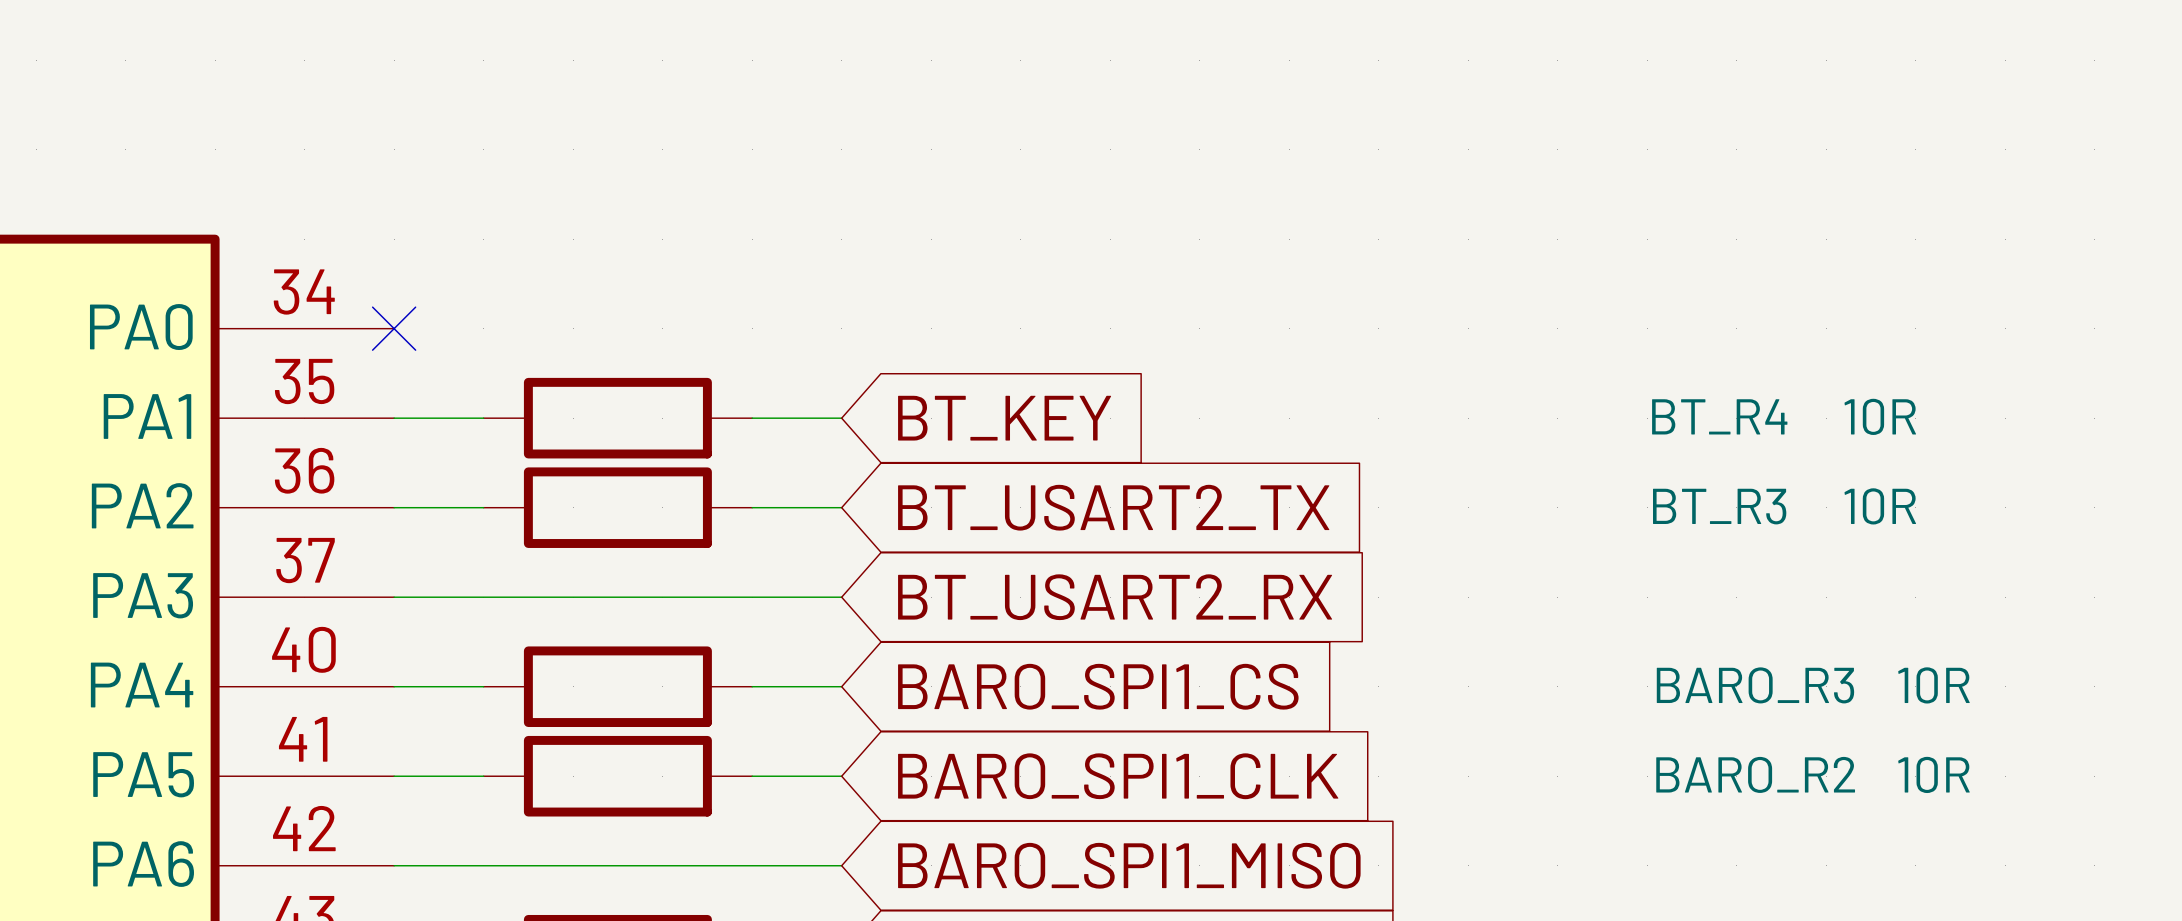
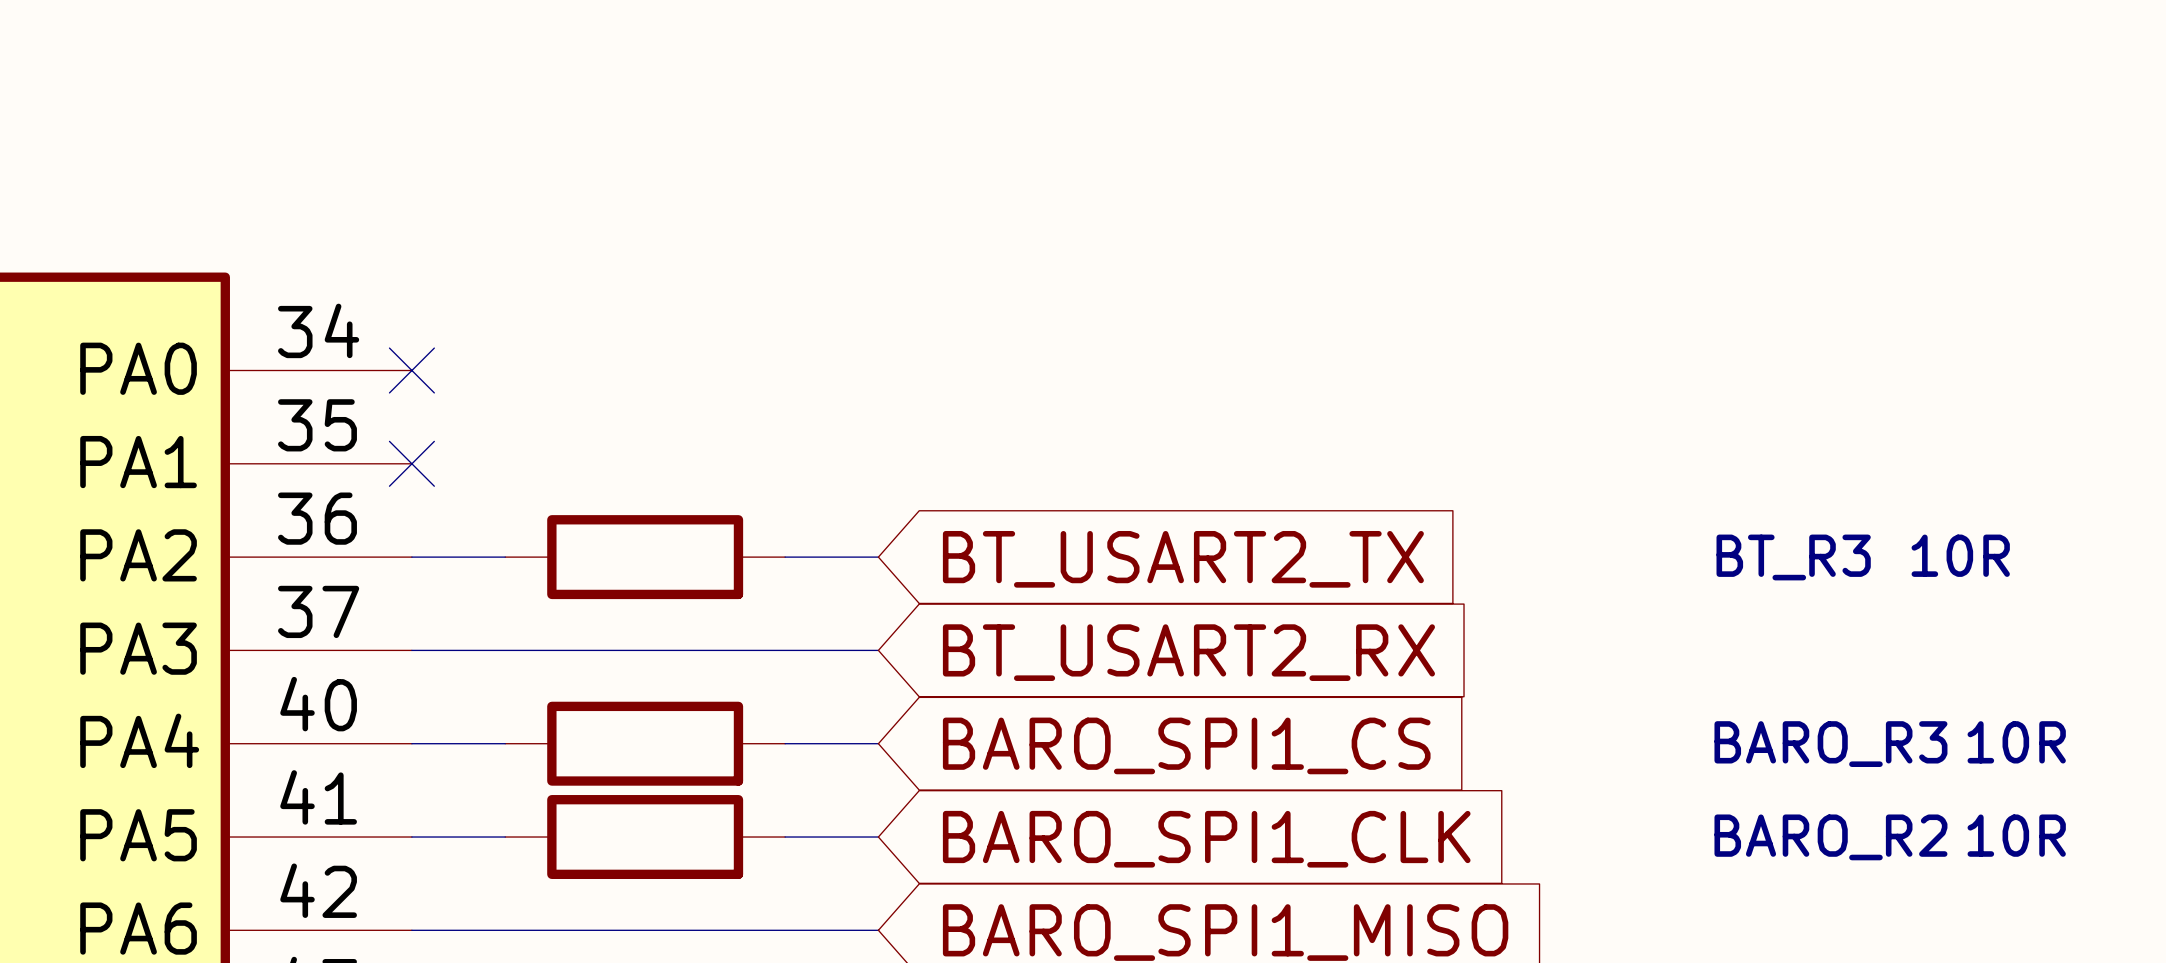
wire: (394, 418) (483, 418) -> none
no-connect mark: none -> (411, 463)
BT_R4: 10R (617, 418) -> none
wire: (752, 418) (841, 418) -> none
global label: BT_KEY (1004, 418) -> none

